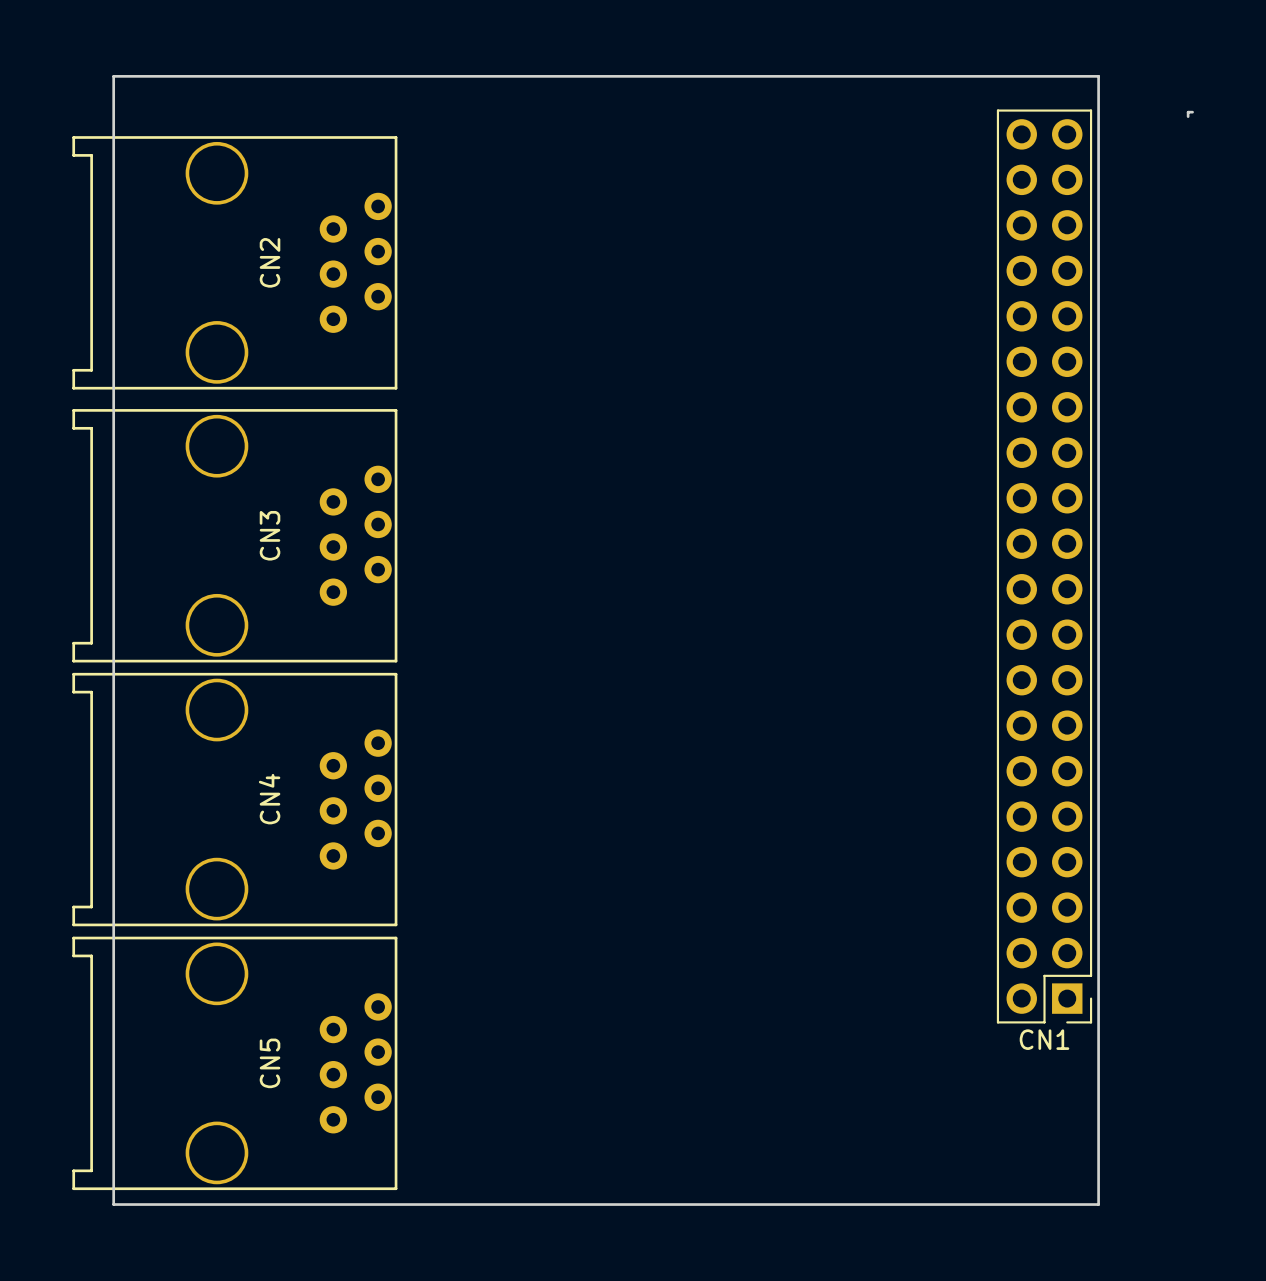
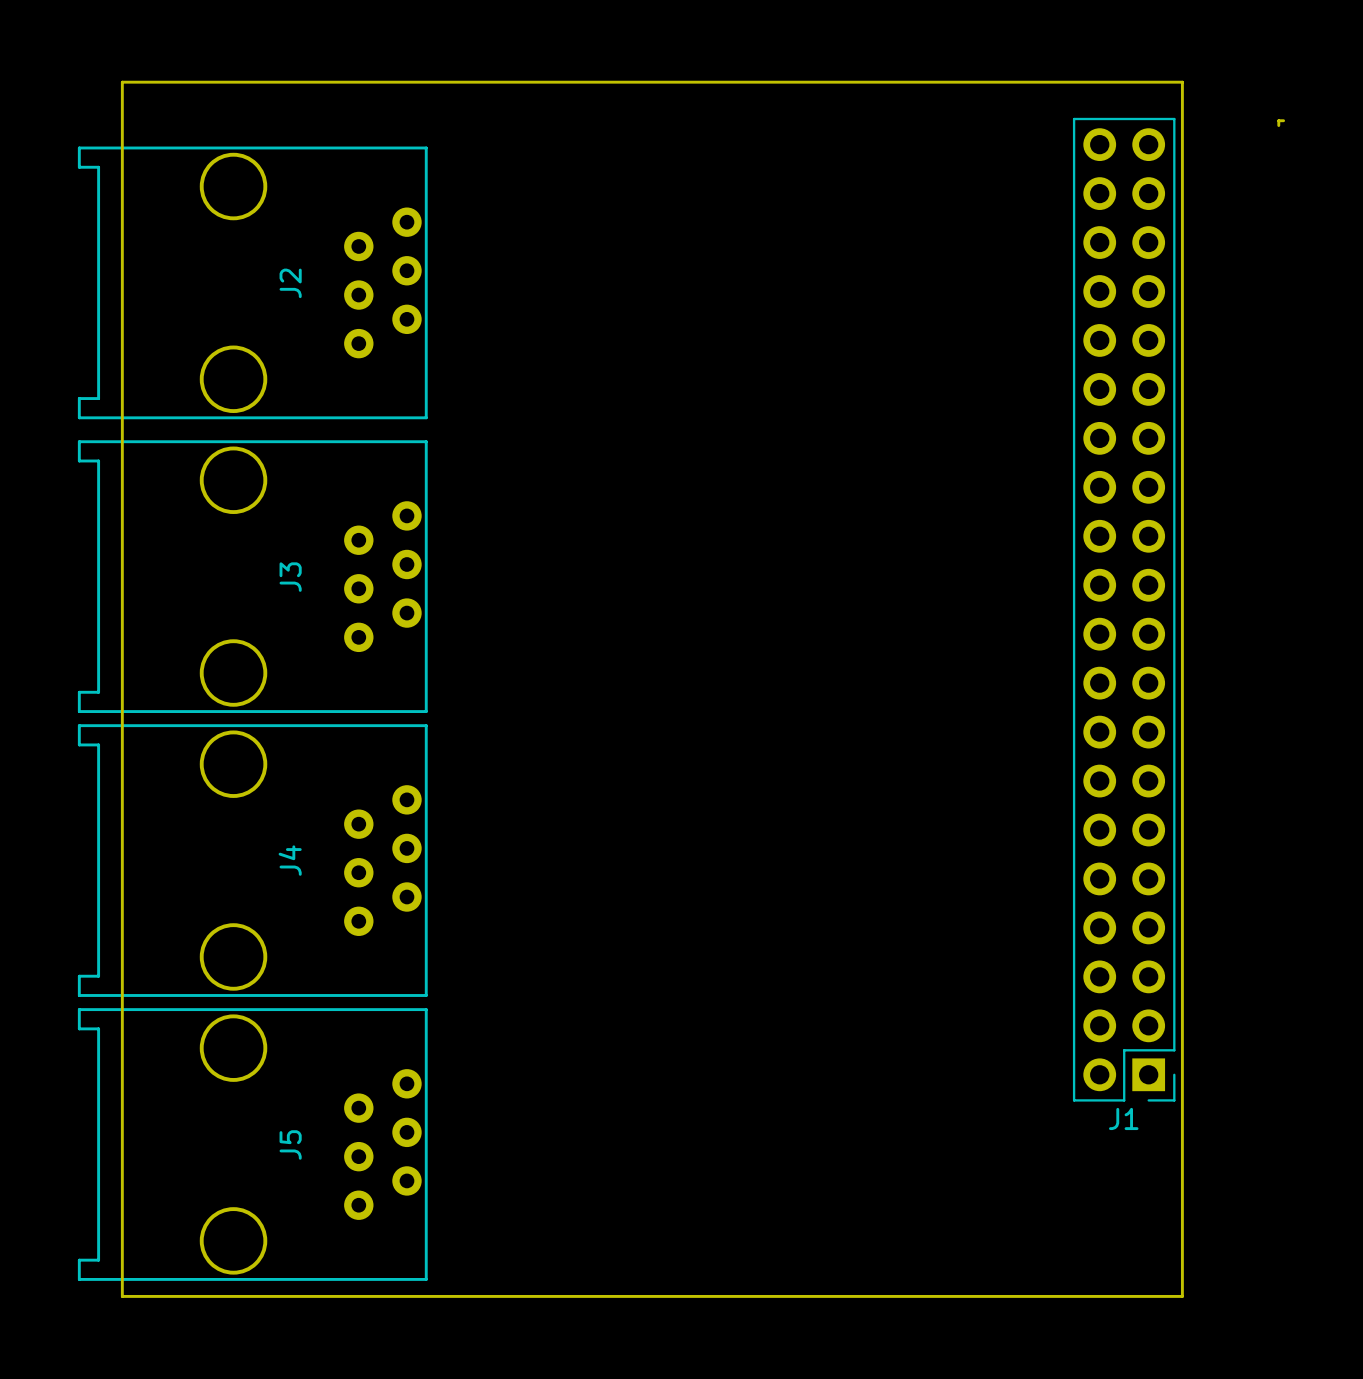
CN2 name: CN2 (270, 262) -> J2 (290, 283)
CN3 name: CN3 (270, 535) -> J3 (290, 577)
CN4 name: CN4 (269, 799) -> J4 (290, 860)
CN1 name: CN1 (1044, 1039) -> J1 (1123, 1118)
CN5 name: CN5 (270, 1063) -> J5 (290, 1144)

